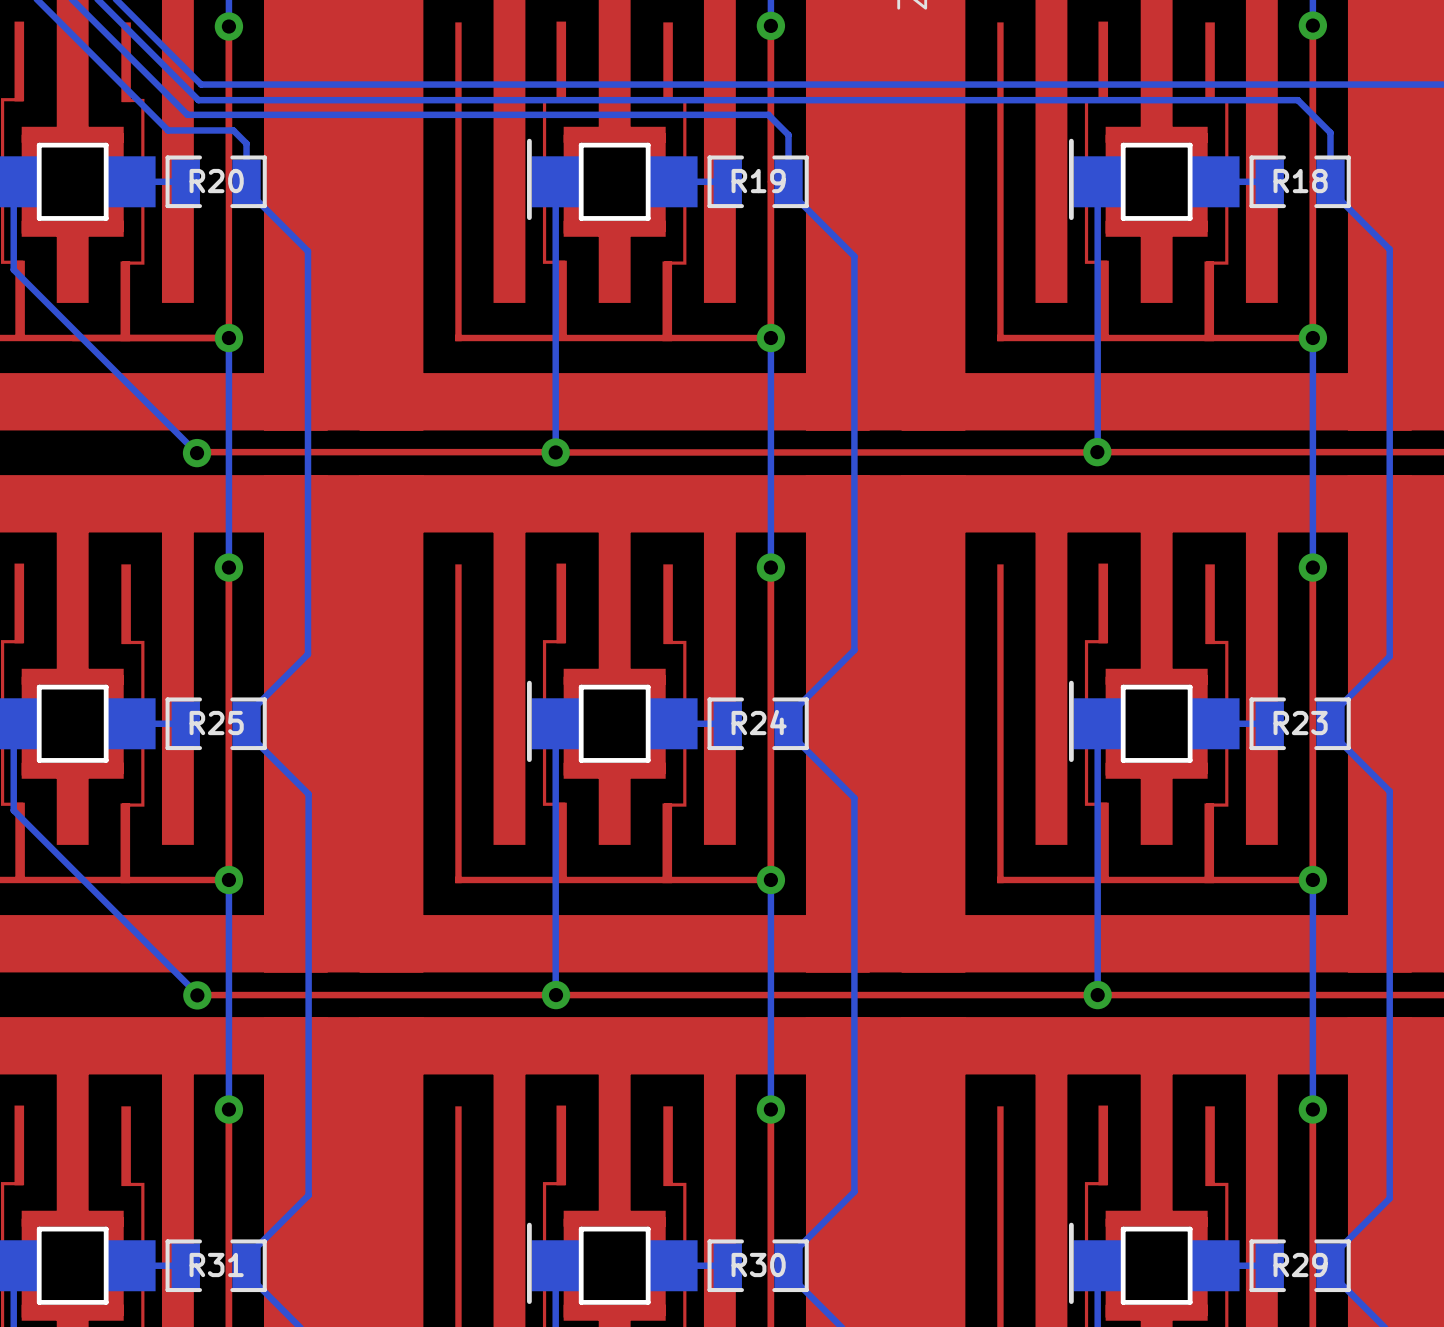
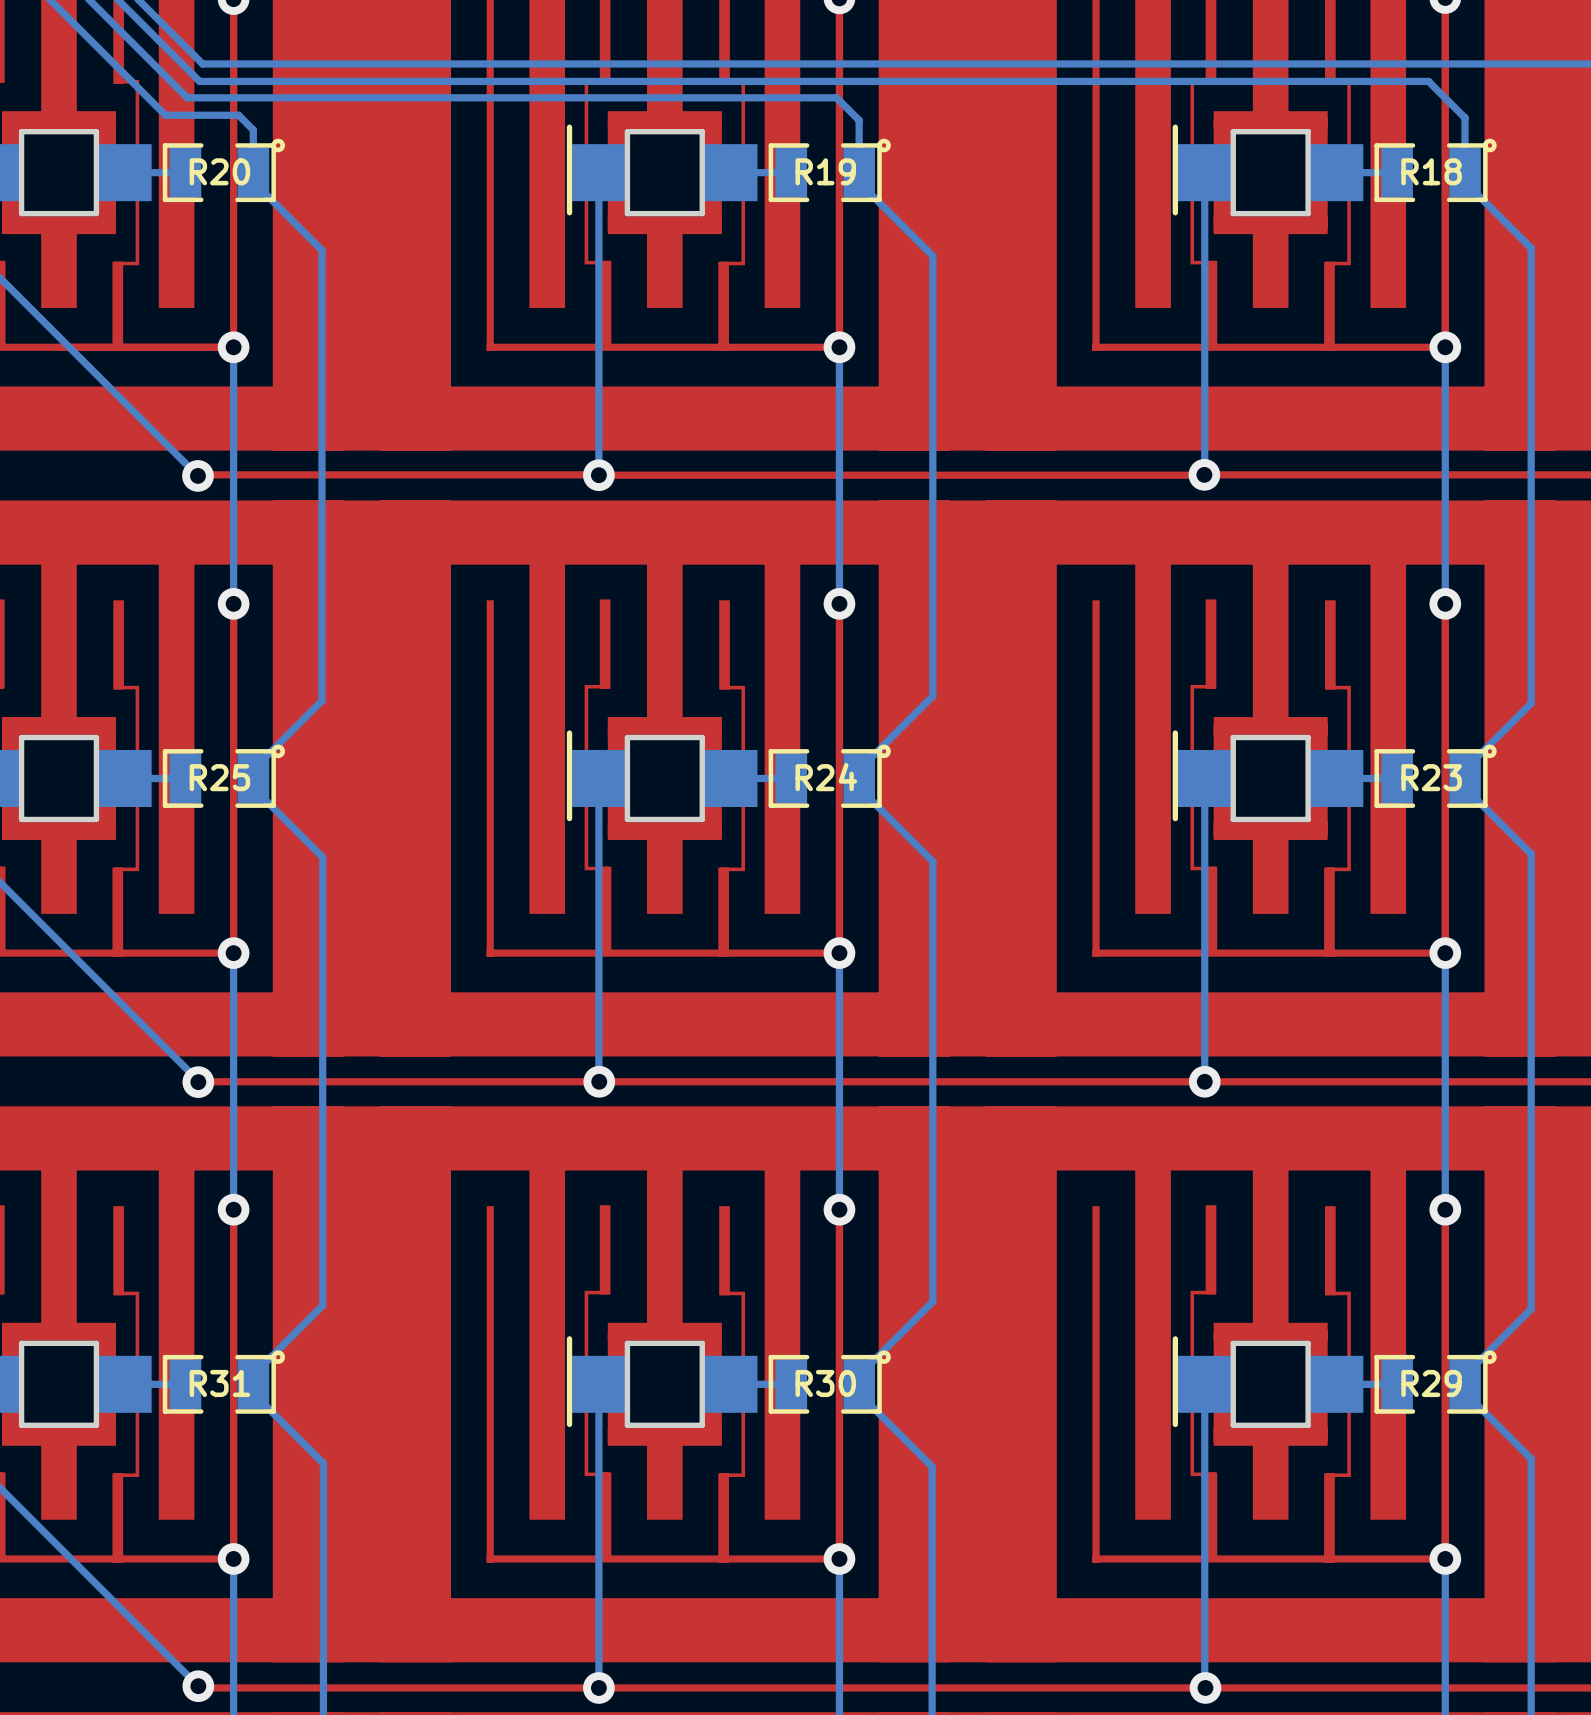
R20 footprint: [165, 155, 267, 209] -> [162, 138, 285, 203]
R19 footprint: [707, 155, 809, 209] -> [768, 138, 891, 203]
R18 footprint: [1249, 155, 1351, 209] -> [1374, 138, 1497, 203]
R25 footprint: [165, 697, 267, 751] -> [162, 744, 285, 808]
R24 footprint: [707, 697, 809, 751] -> [768, 744, 891, 808]
R23 footprint: [1249, 697, 1351, 751] -> [1374, 744, 1497, 808]
R31 footprint: [165, 1239, 267, 1293] -> [162, 1350, 285, 1414]
R30 footprint: [707, 1239, 809, 1293] -> [768, 1350, 891, 1414]
R29 footprint: [1249, 1239, 1351, 1293] -> [1374, 1350, 1497, 1414]

